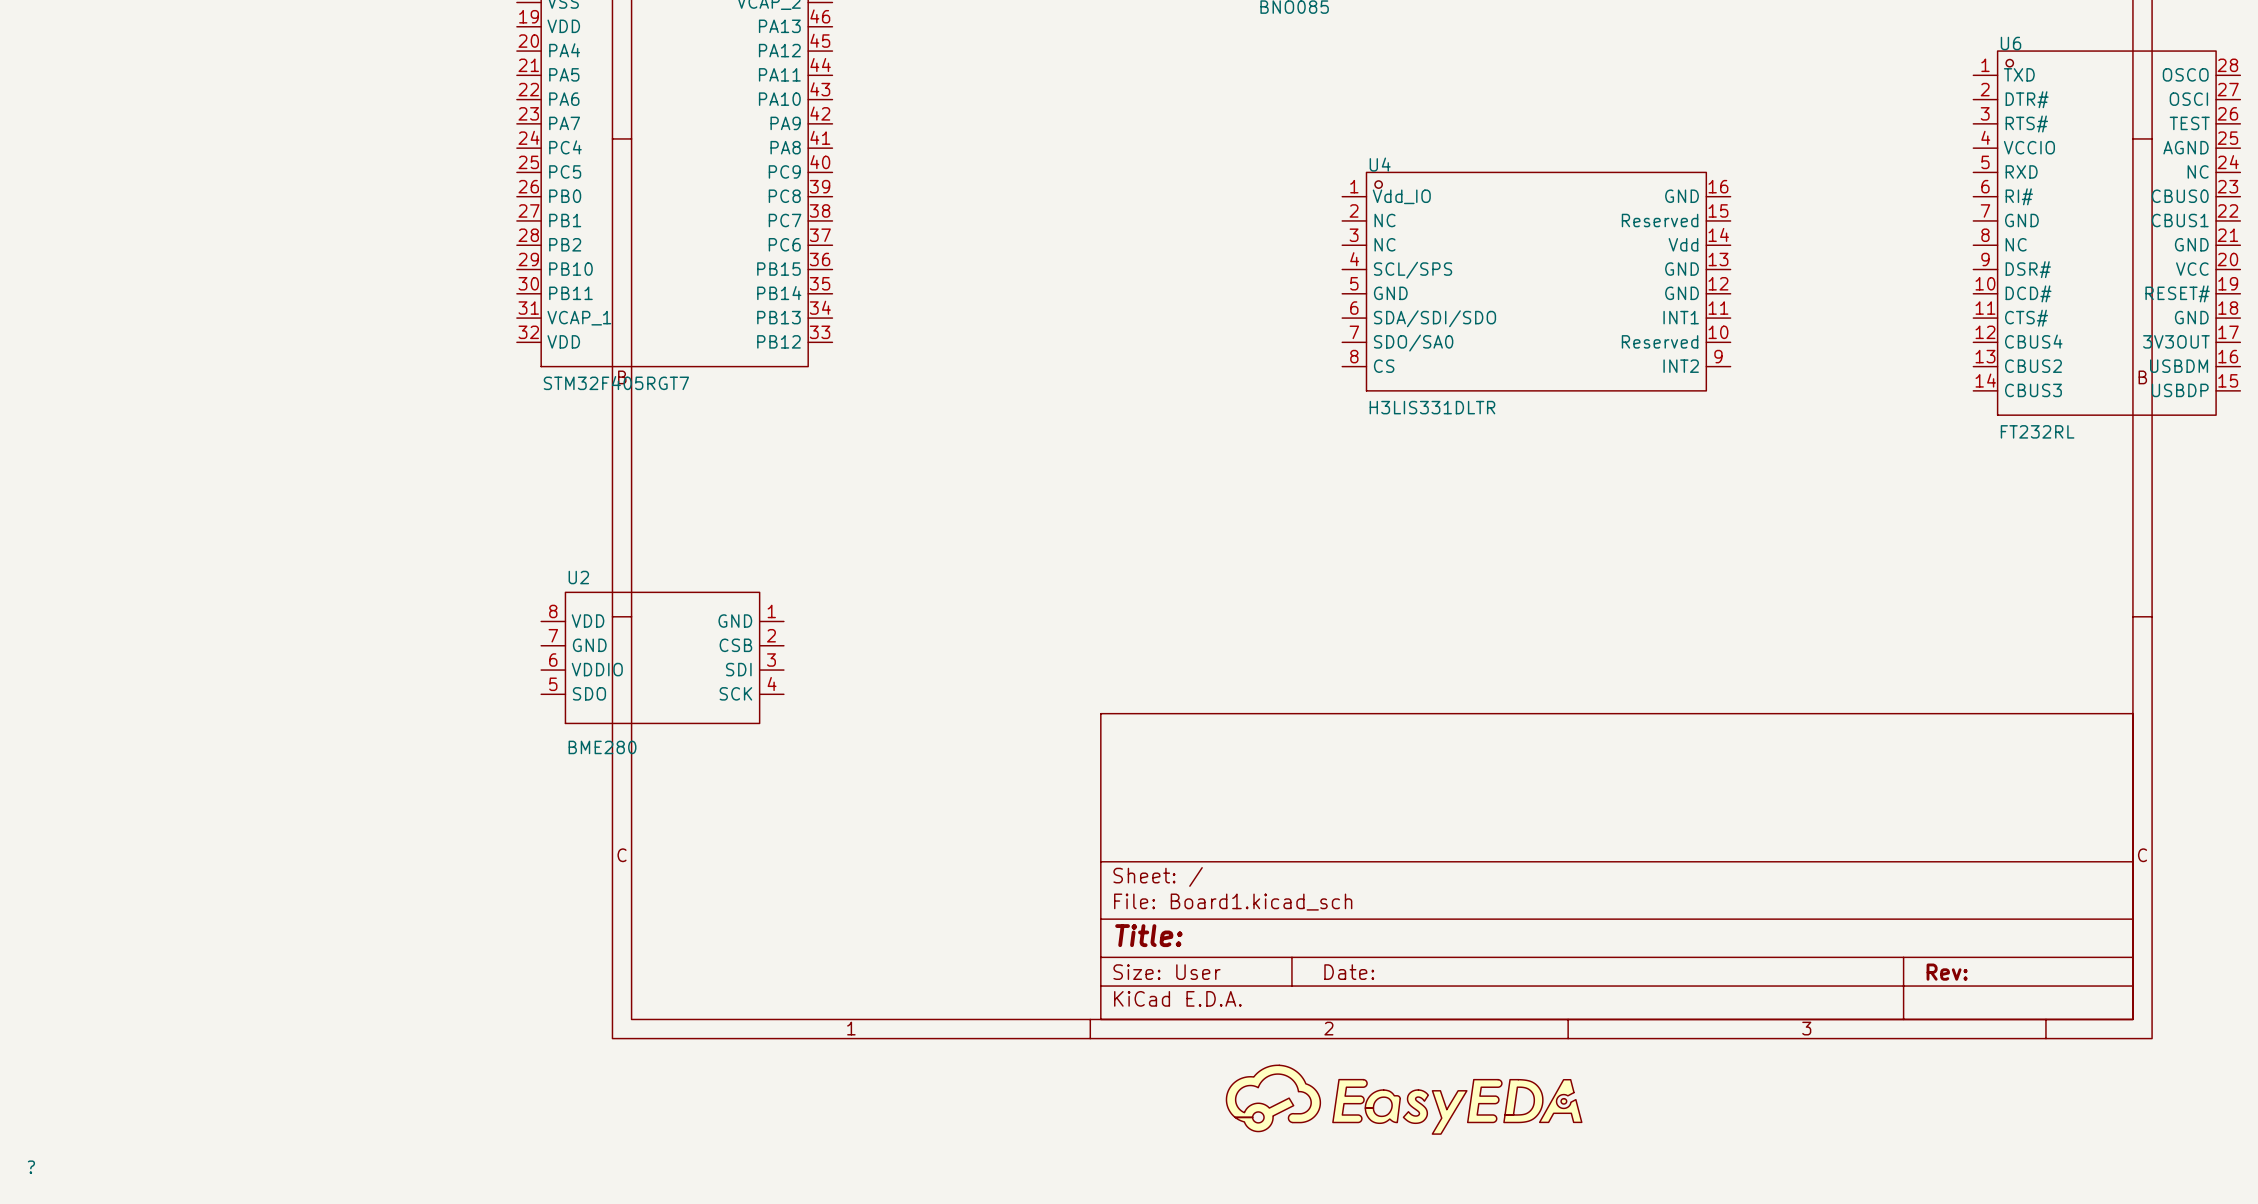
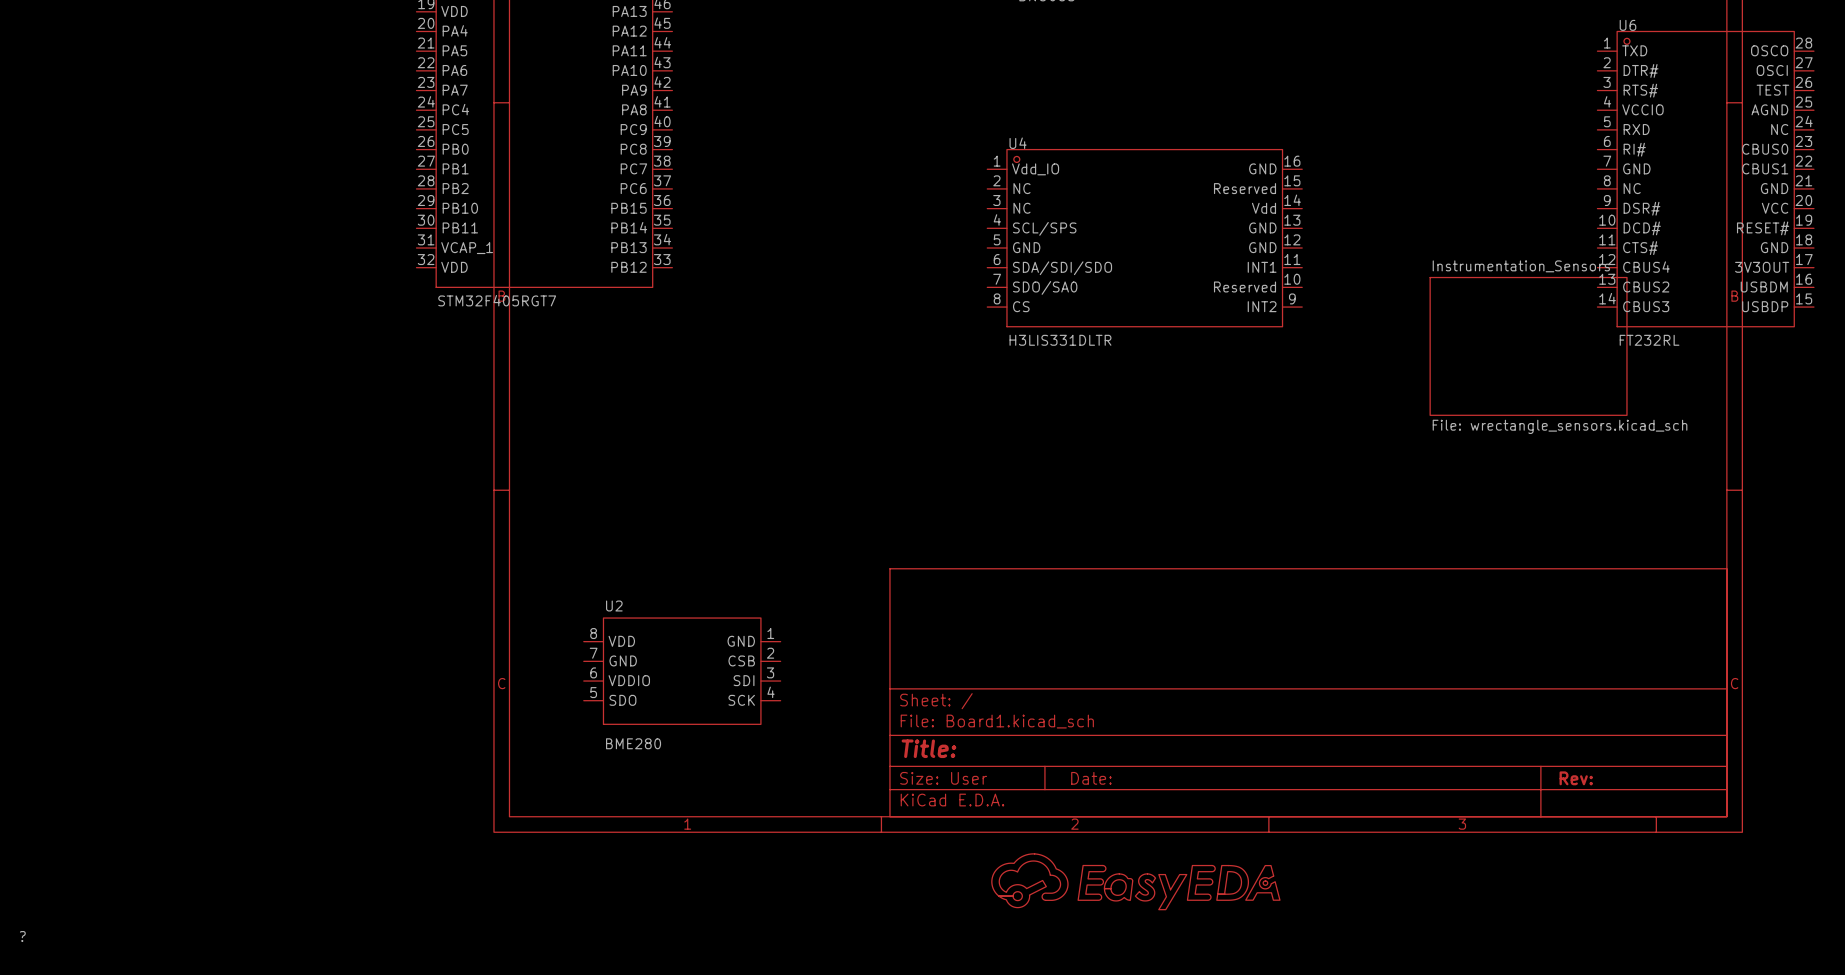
U4 position: (1536, 281) -> (1144, 238)
sheet Instrumentation_Sensors: none -> File: wrectangle_sensors.kicad_sch (1528, 346)
U2 position: (662, 657) -> (682, 671)

